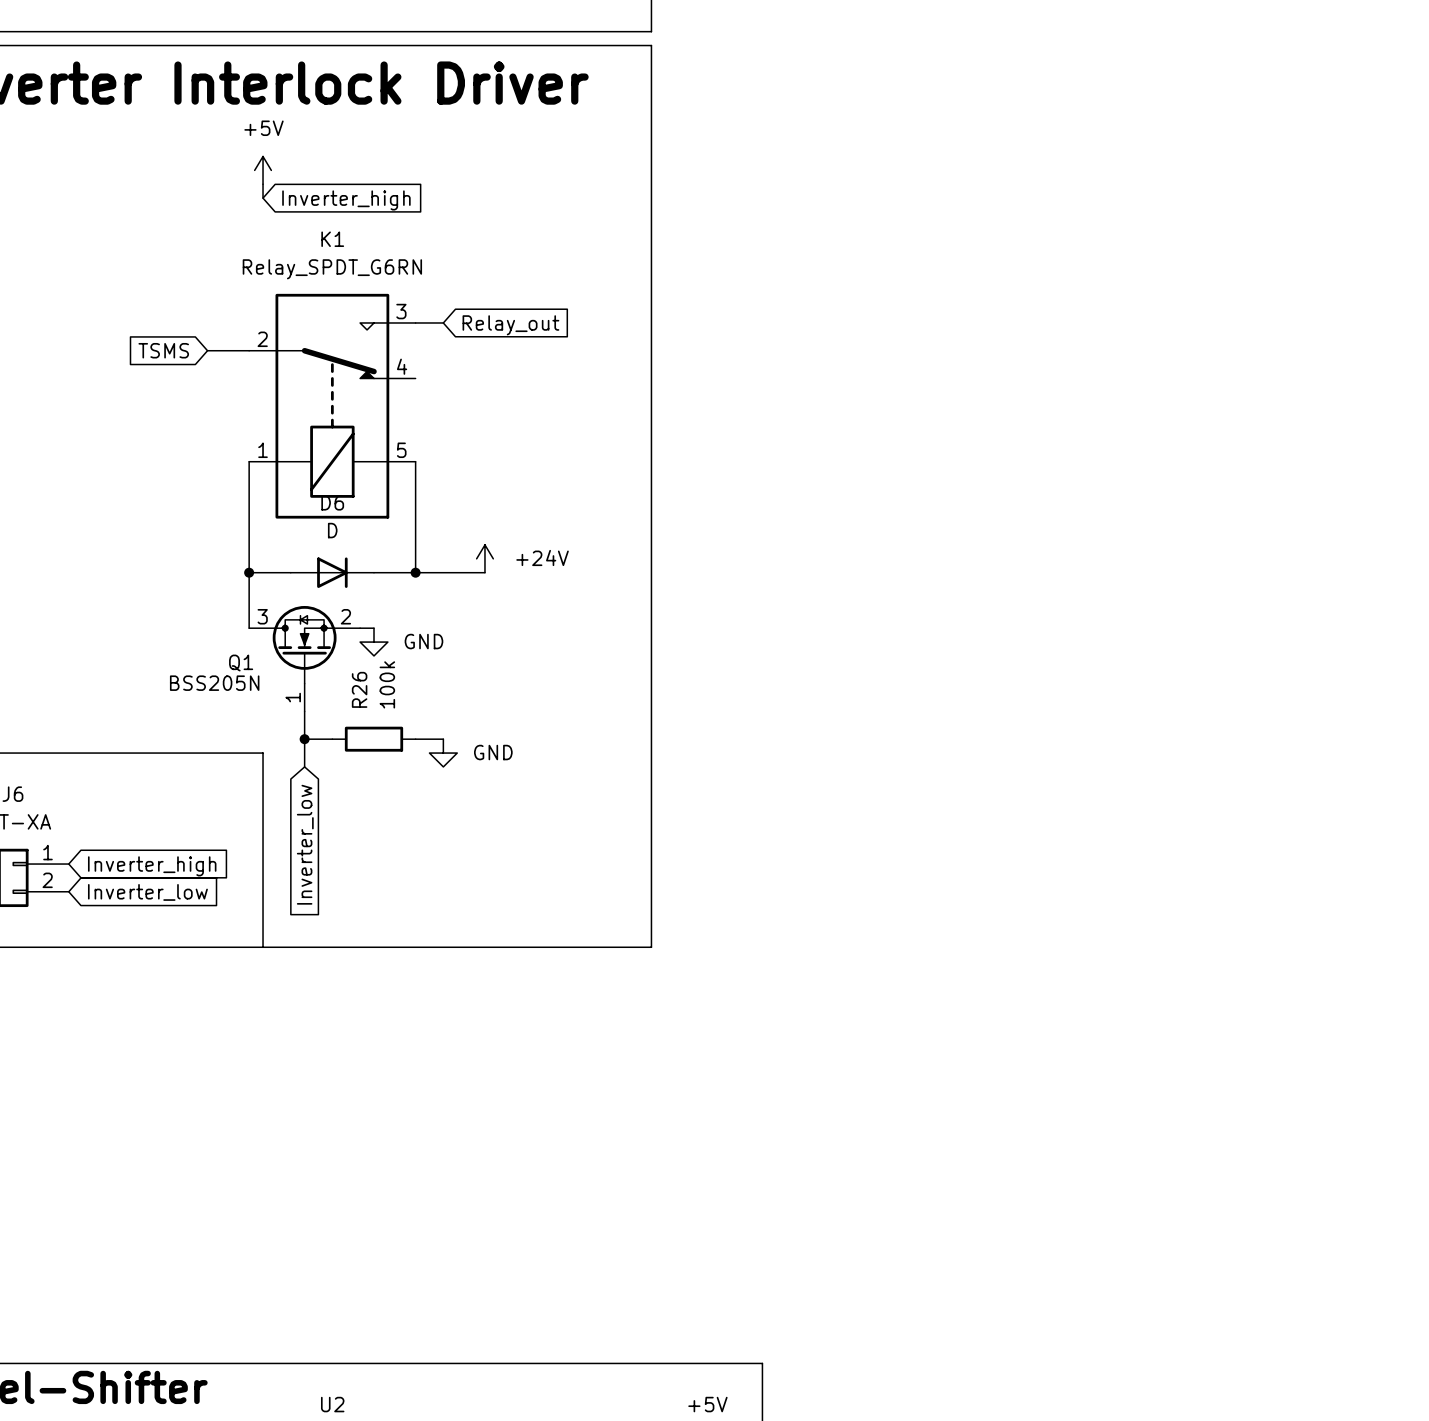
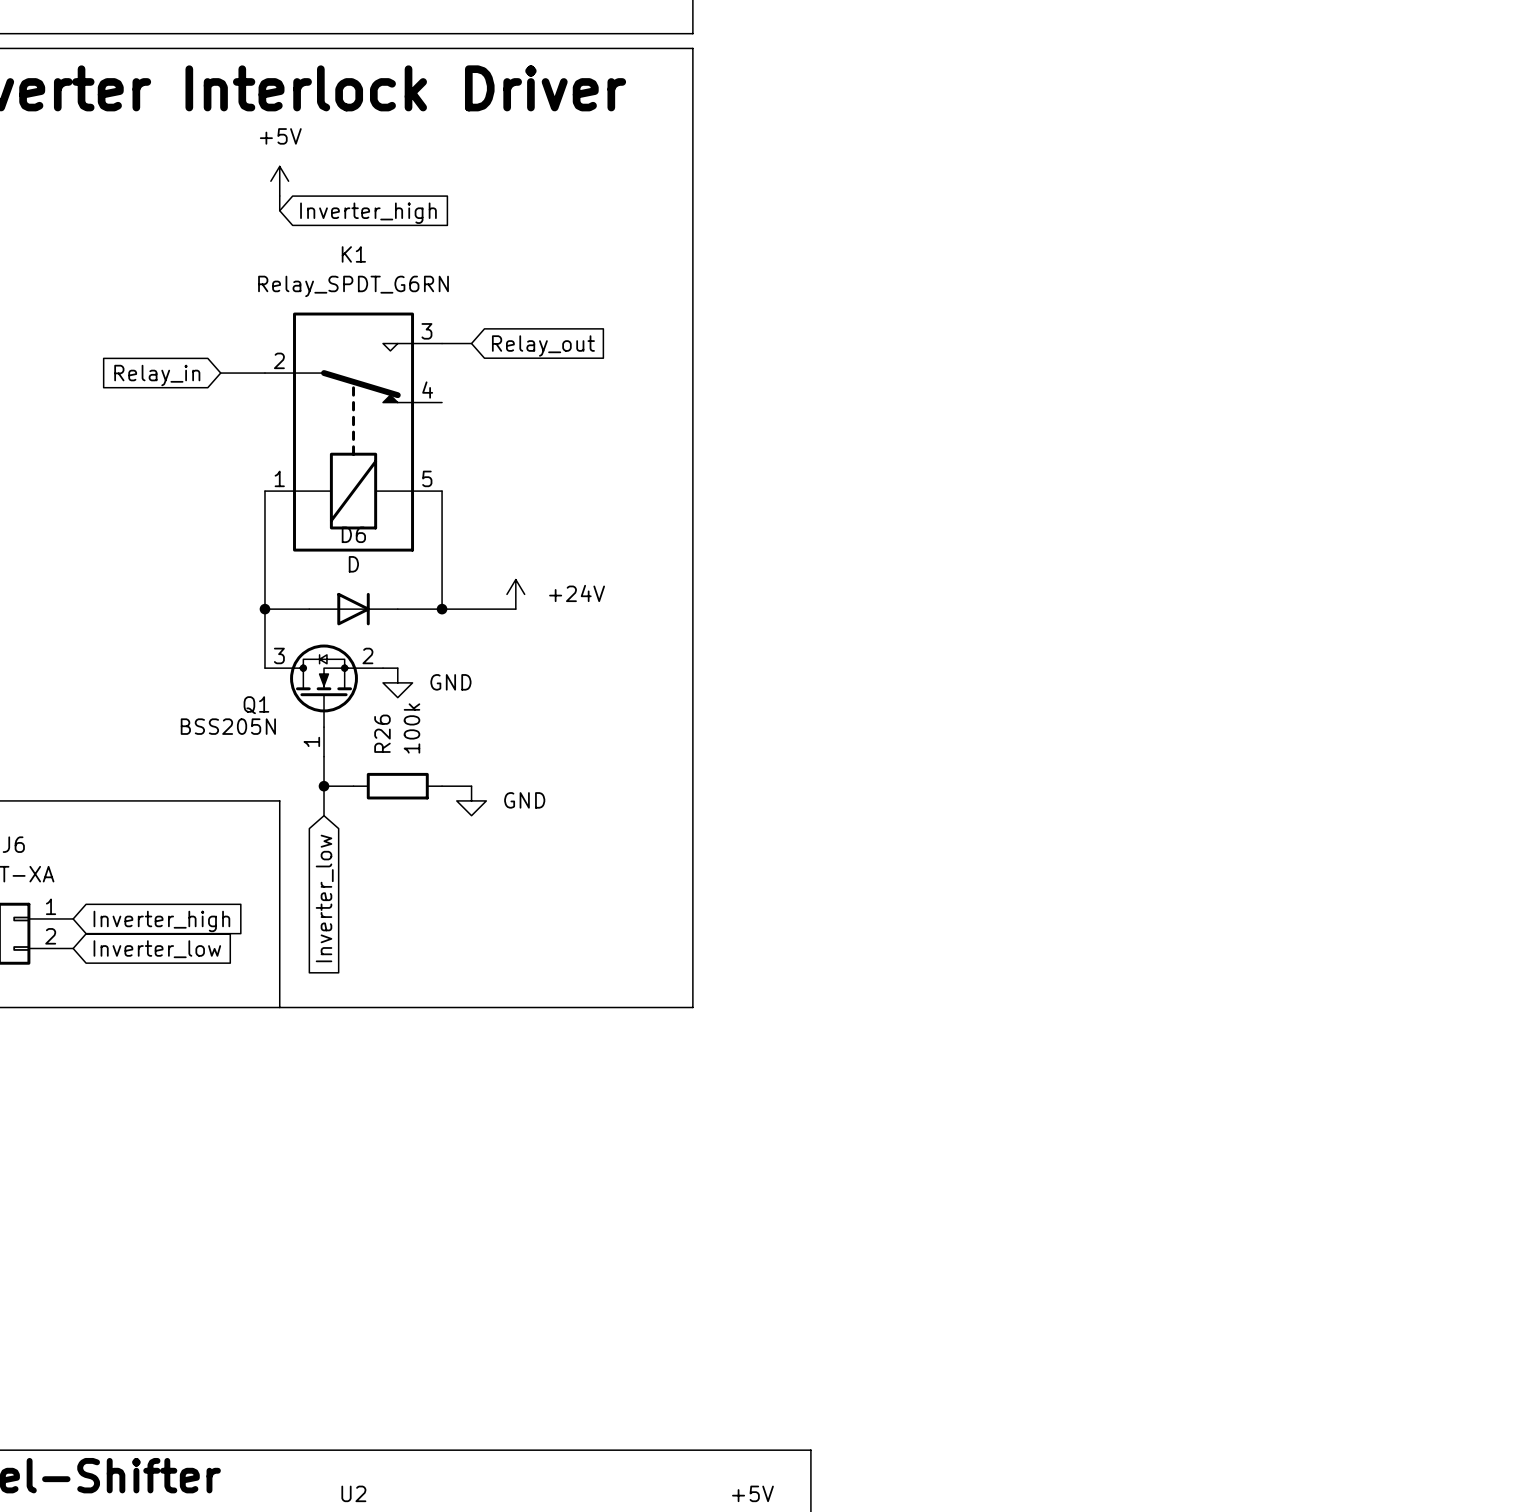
global label: TSMS (163, 350) -> Relay_in (157, 375)

